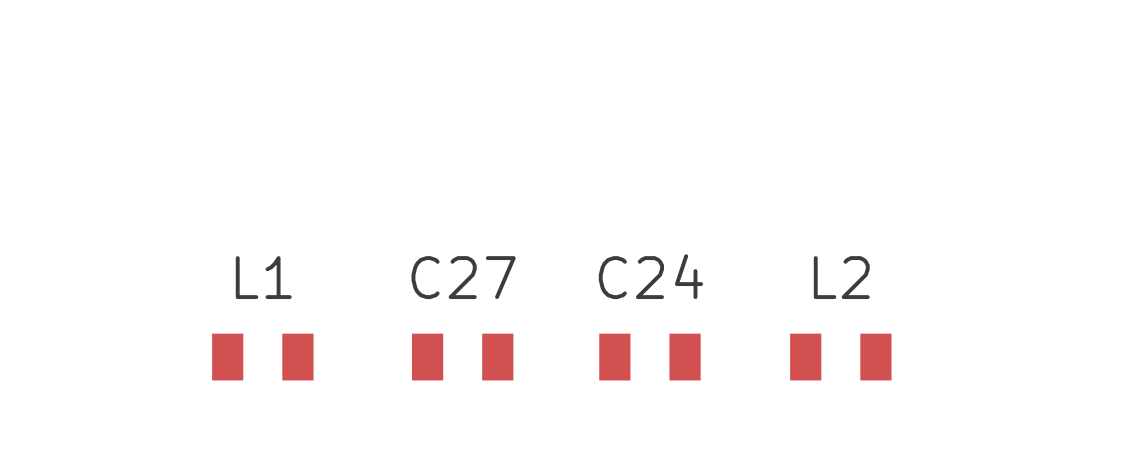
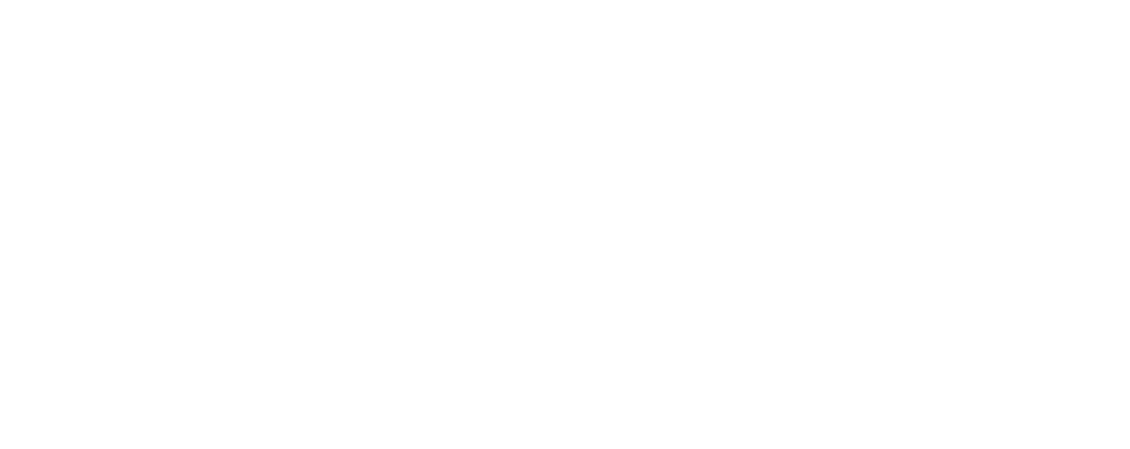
L1: (262, 357) -> none
C27: (462, 357) -> none
C24: (649, 357) -> none
L2: (840, 357) -> none

